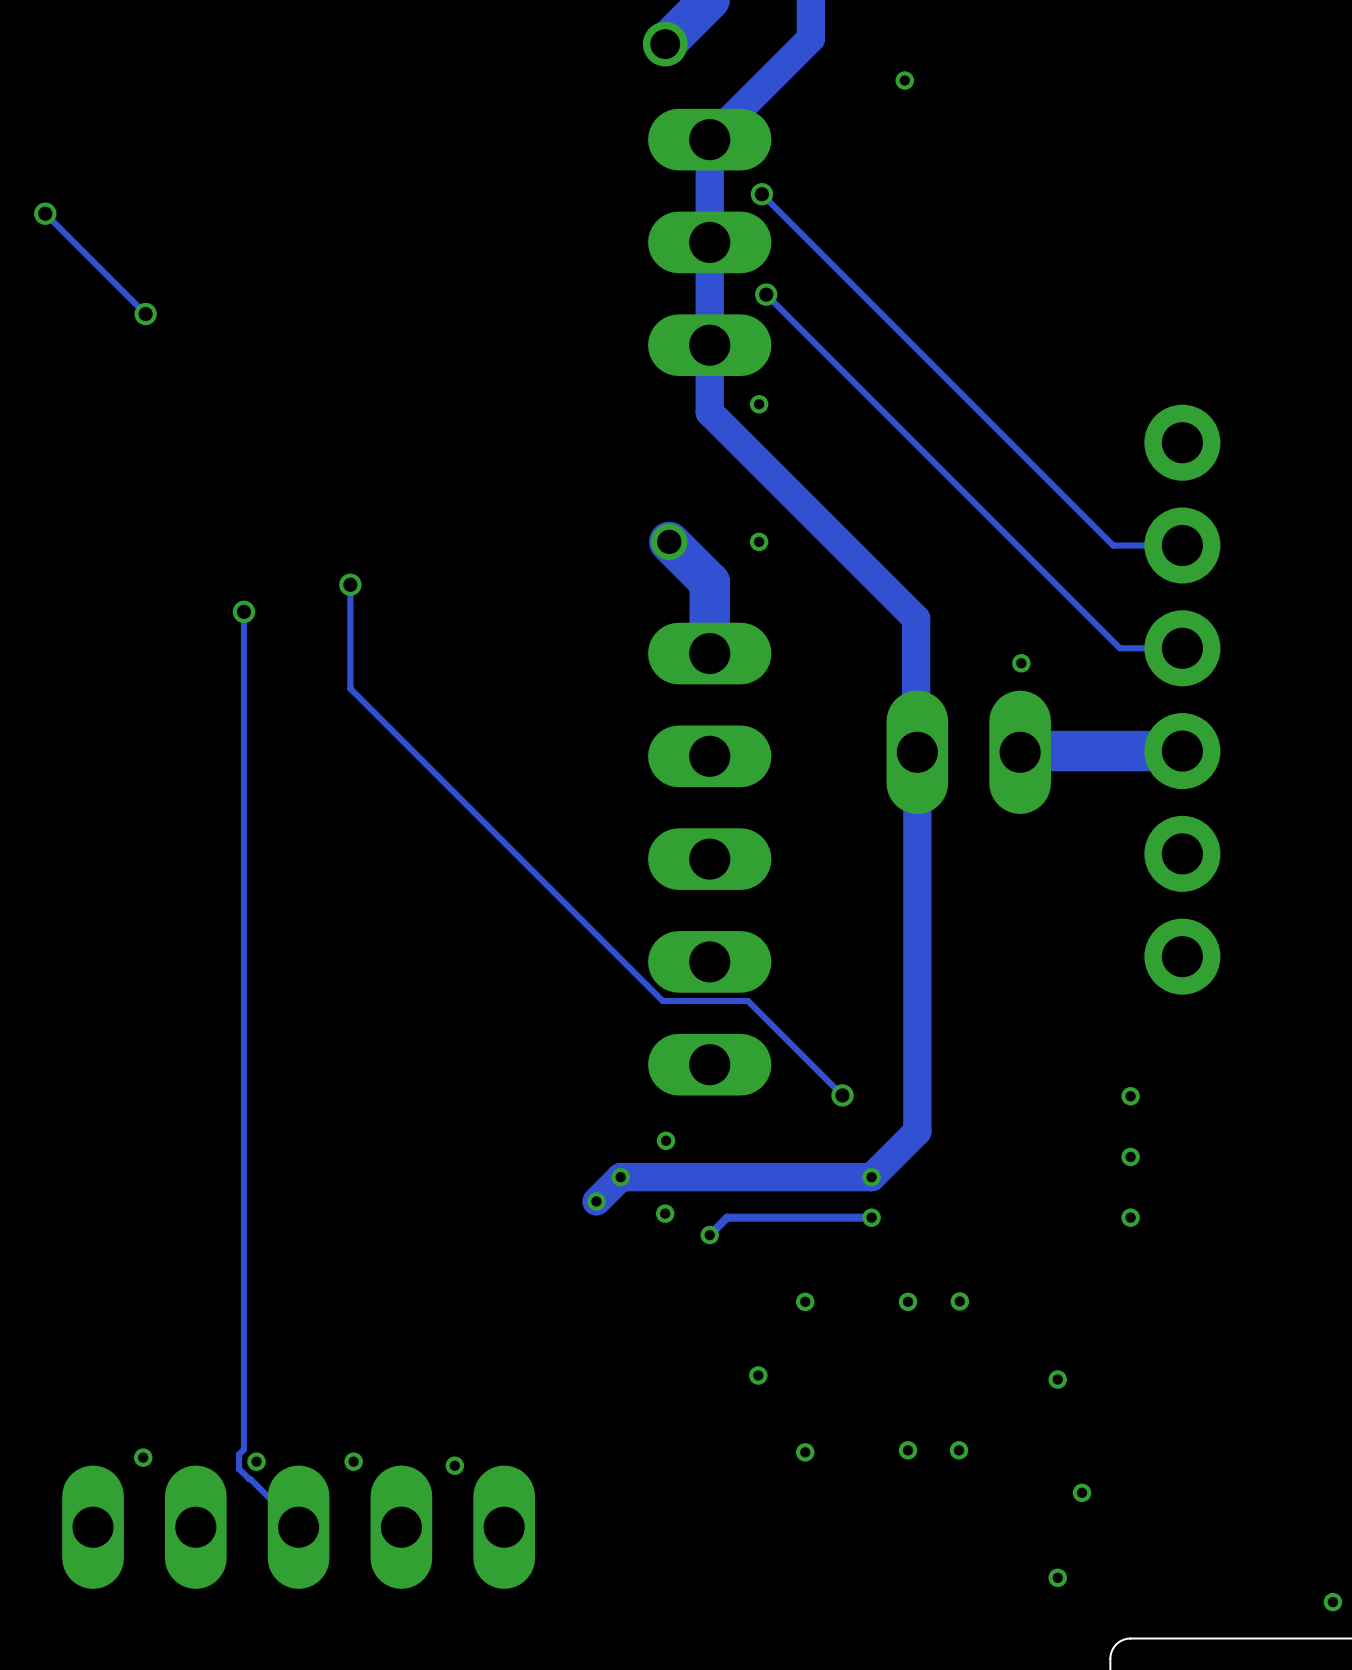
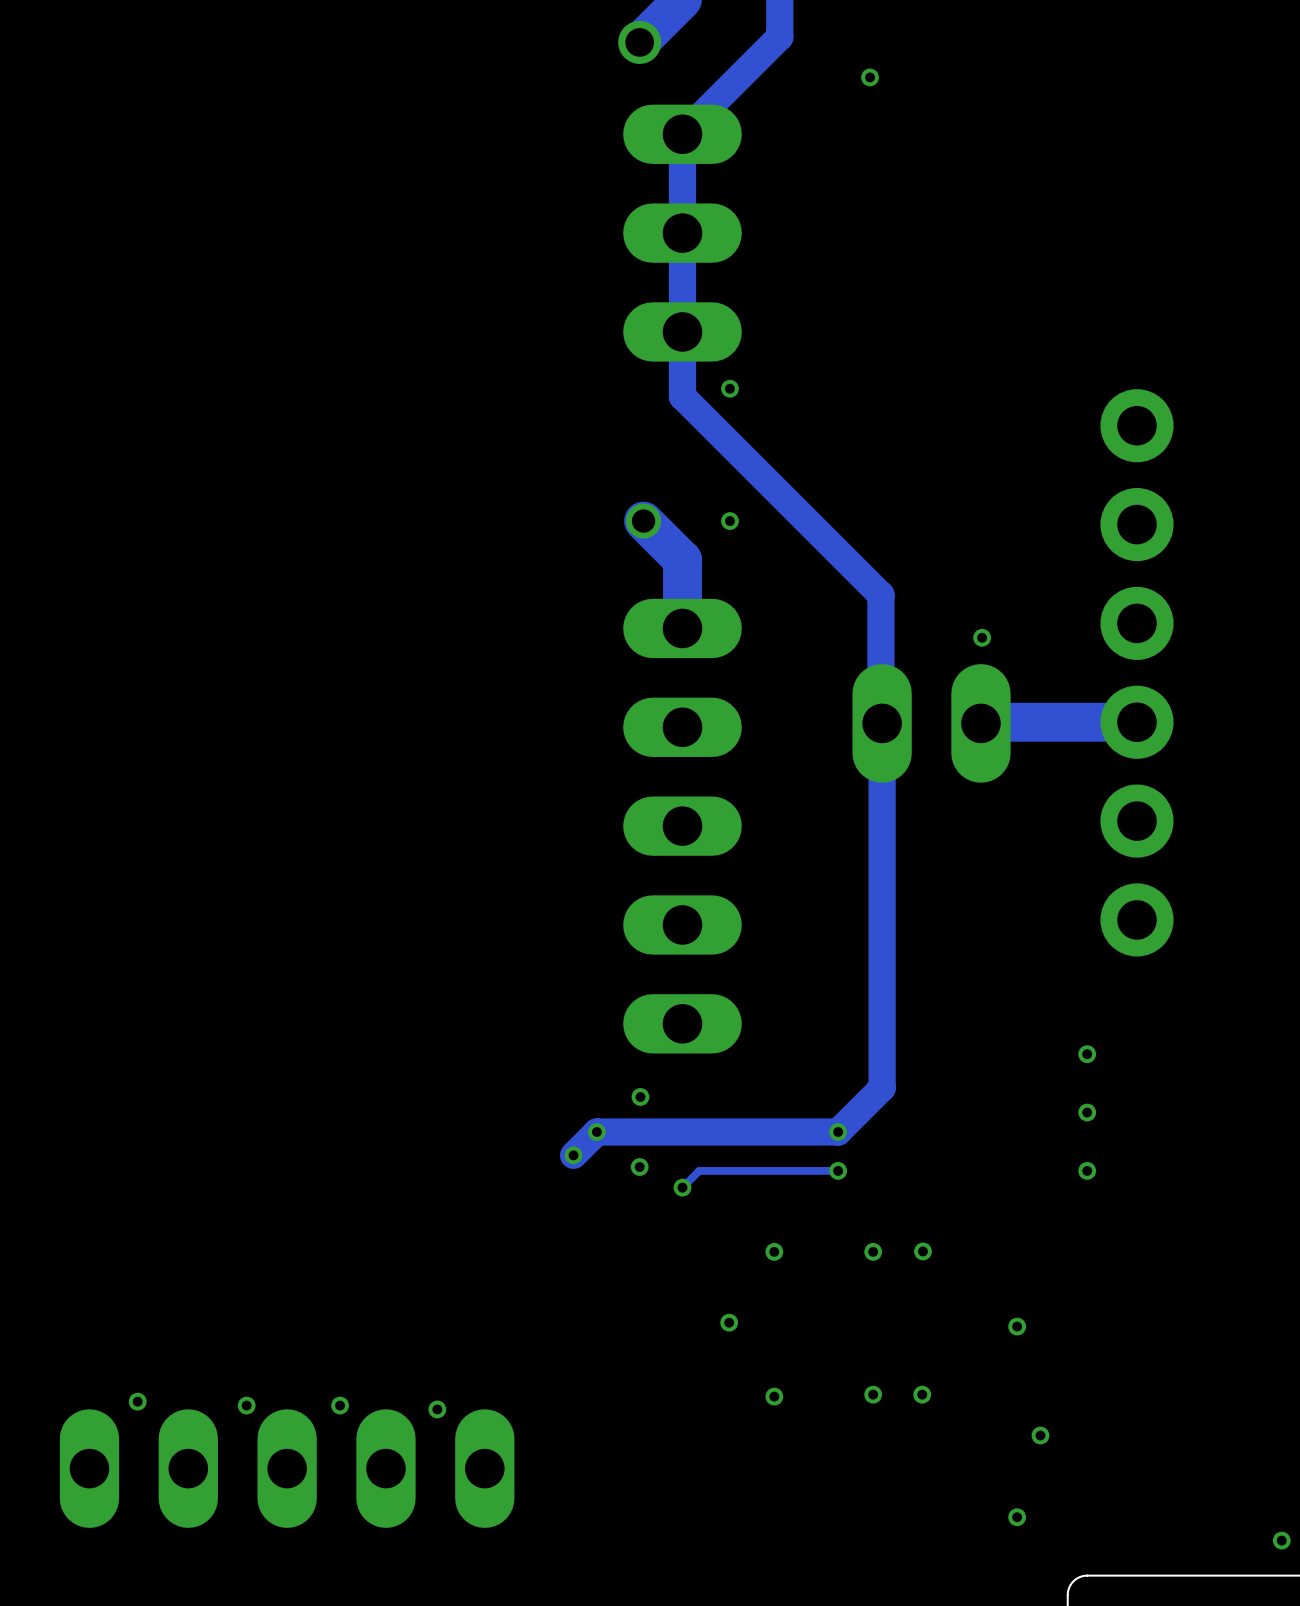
track: (761, 194) (1113, 545) (1182, 545) -> none
via: (761, 194) -> none
track: (45, 213) (145, 314) -> none
via: (45, 213) -> none
track: (766, 294) (1119, 648) (1182, 648) -> none
via: (766, 294) -> none
via: (145, 314) -> none
track: (350, 584) (350, 688) (662, 1000) (747, 1000) (842, 1095) -> none
via: (350, 584) -> none
track: (243, 611) (243, 1449) (239, 1454) (239, 1468) (298, 1527) -> none
via: (243, 611) -> none
via: (842, 1095) -> none

